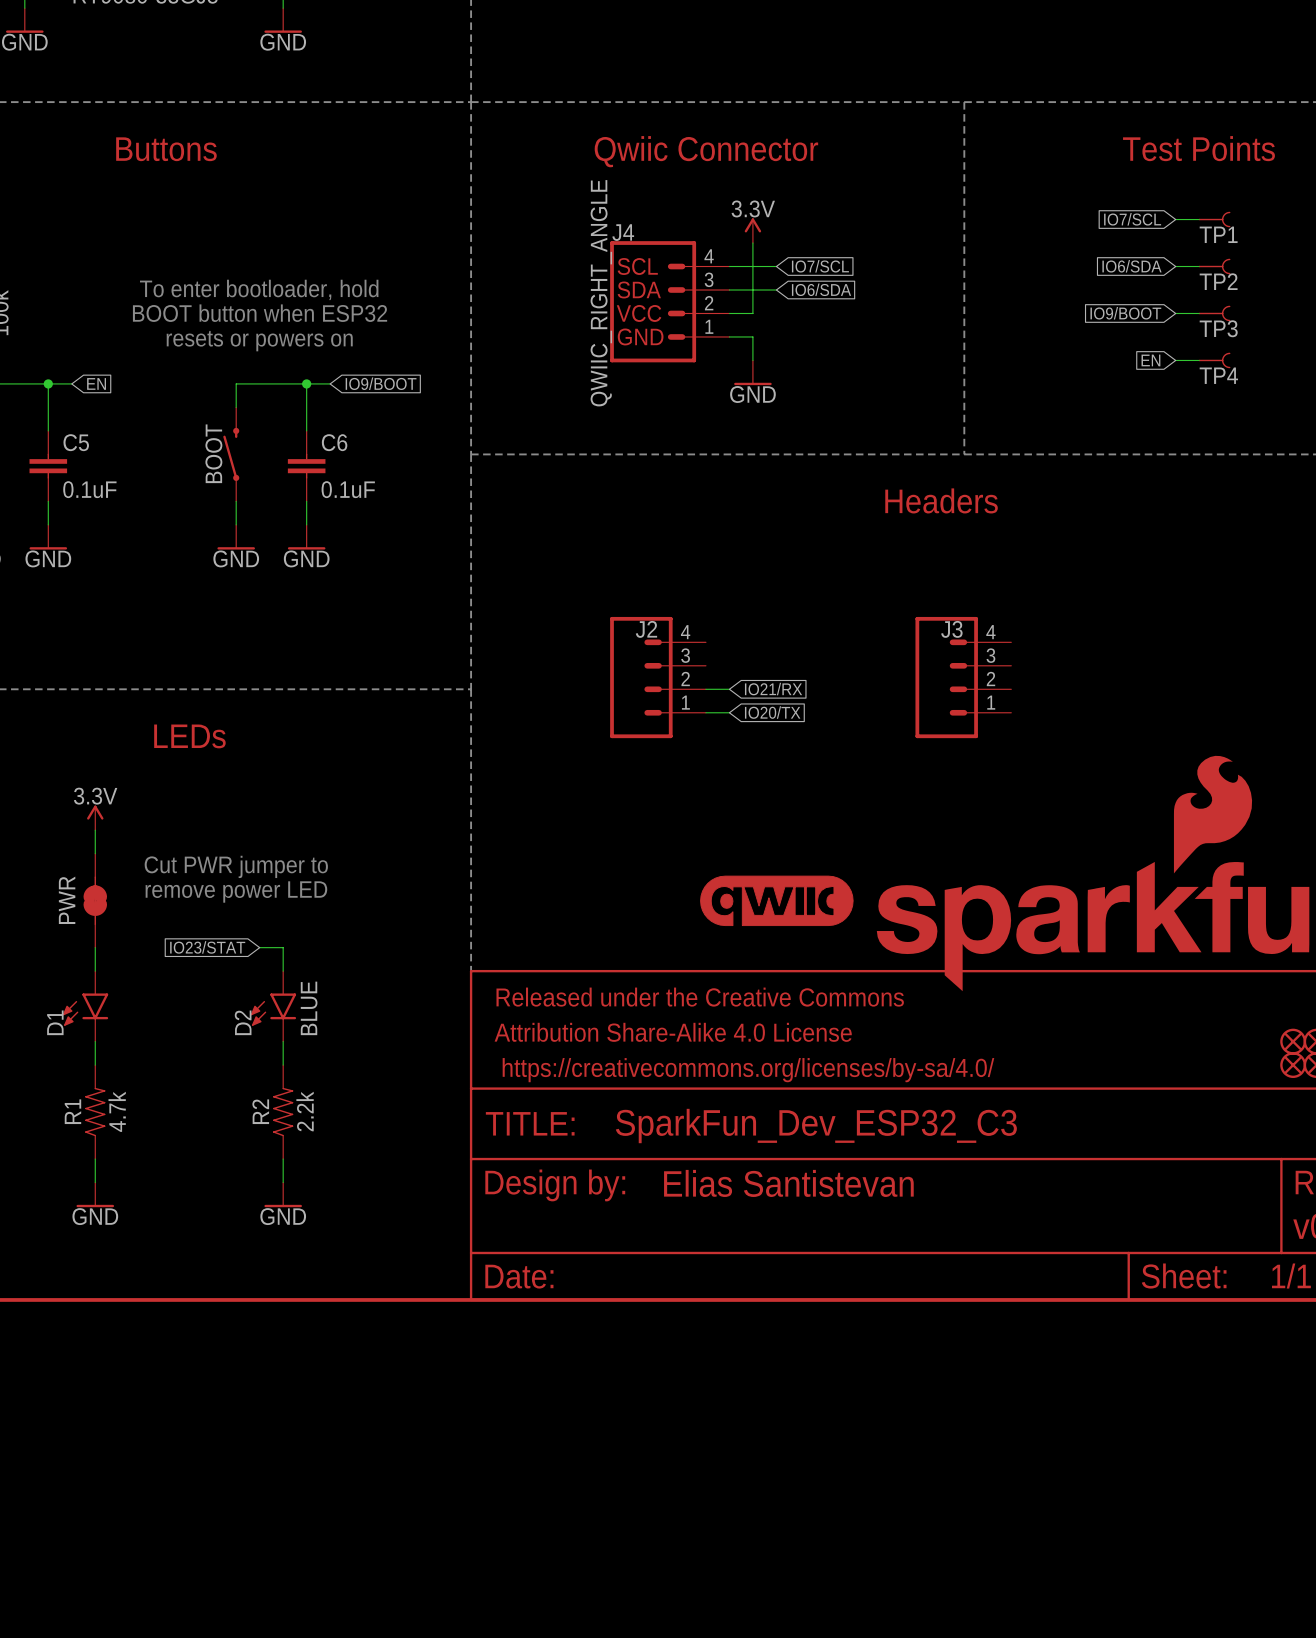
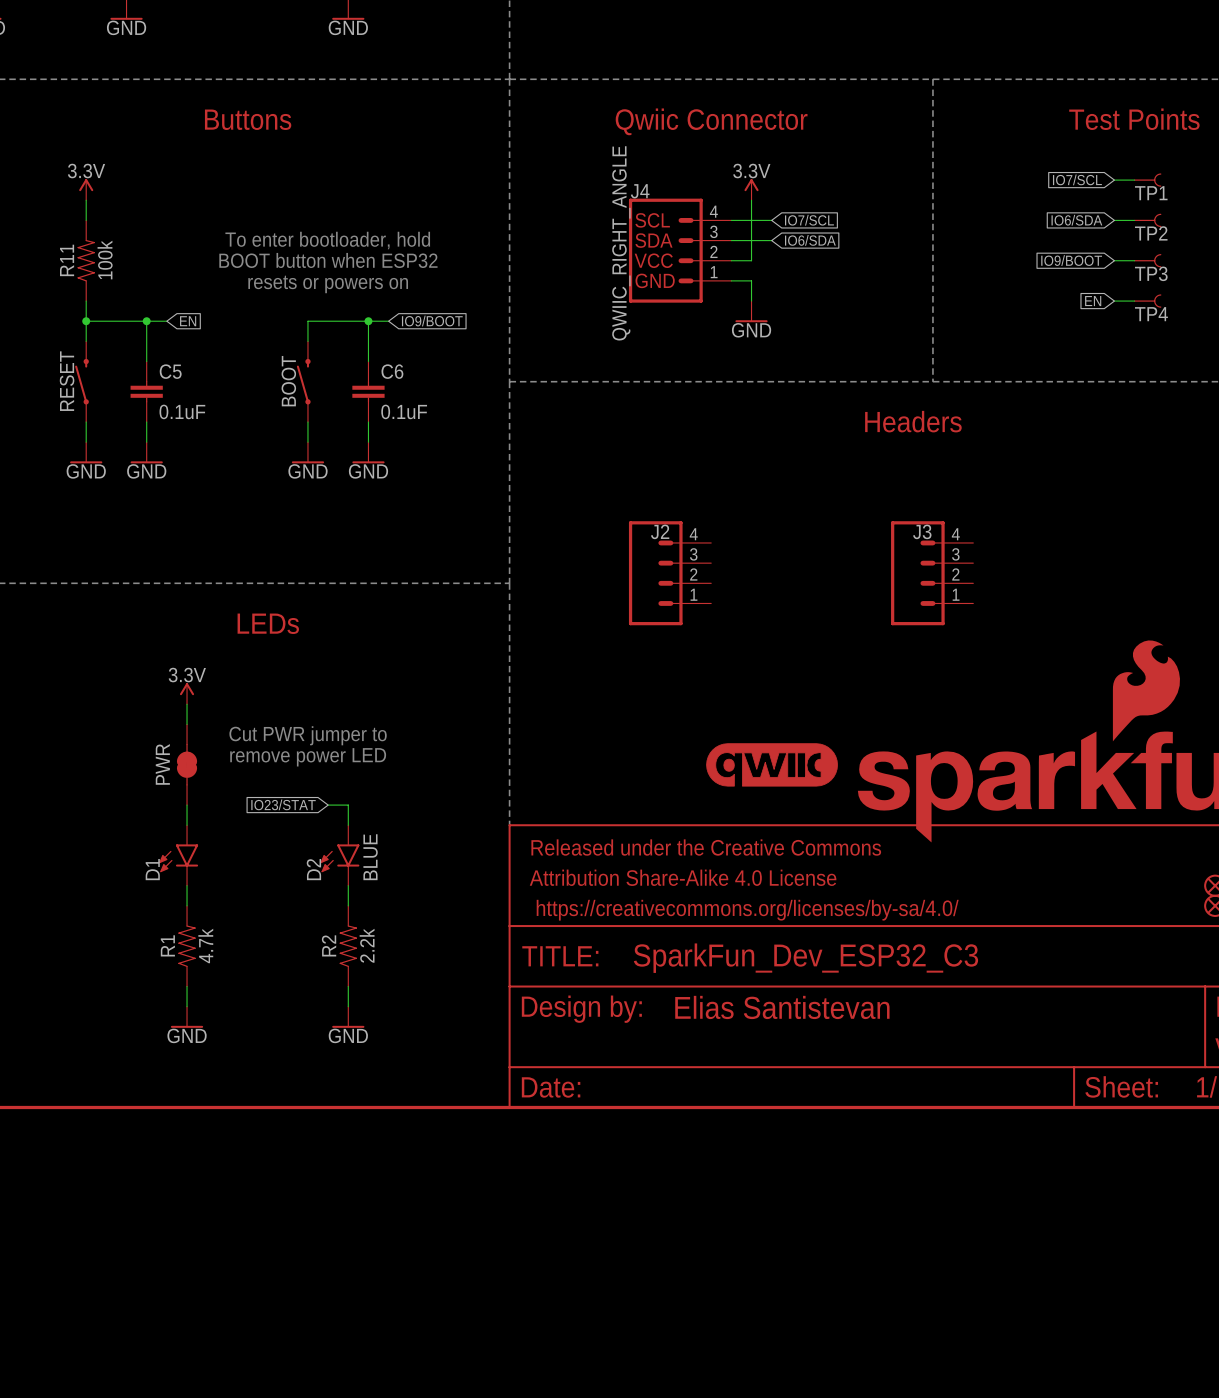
wire: (705, 689) (729, 689) -> none
global label: IO21/RX (773, 689) -> none
wire: (705, 712) (729, 712) -> none
global label: IO20/TX (772, 712) -> none

